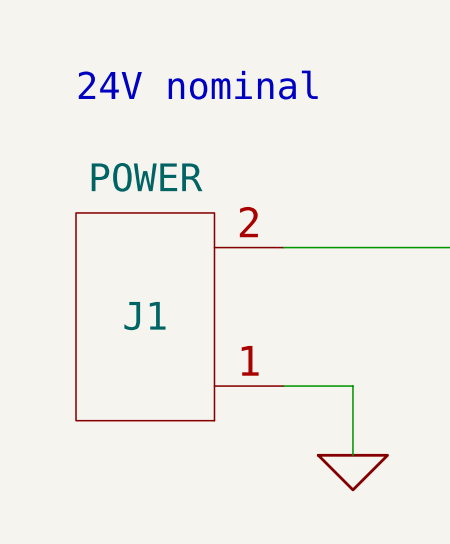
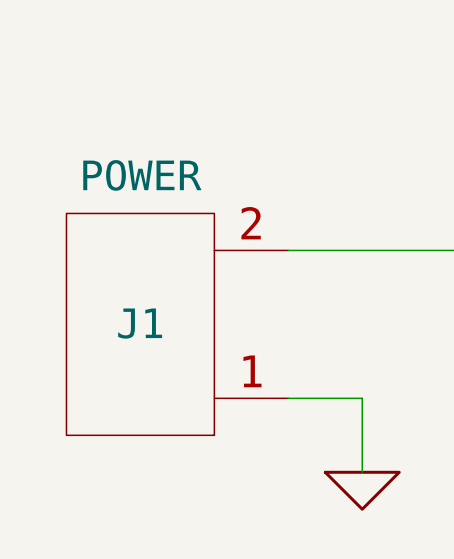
text: 24V nominal (198, 85) -> none

